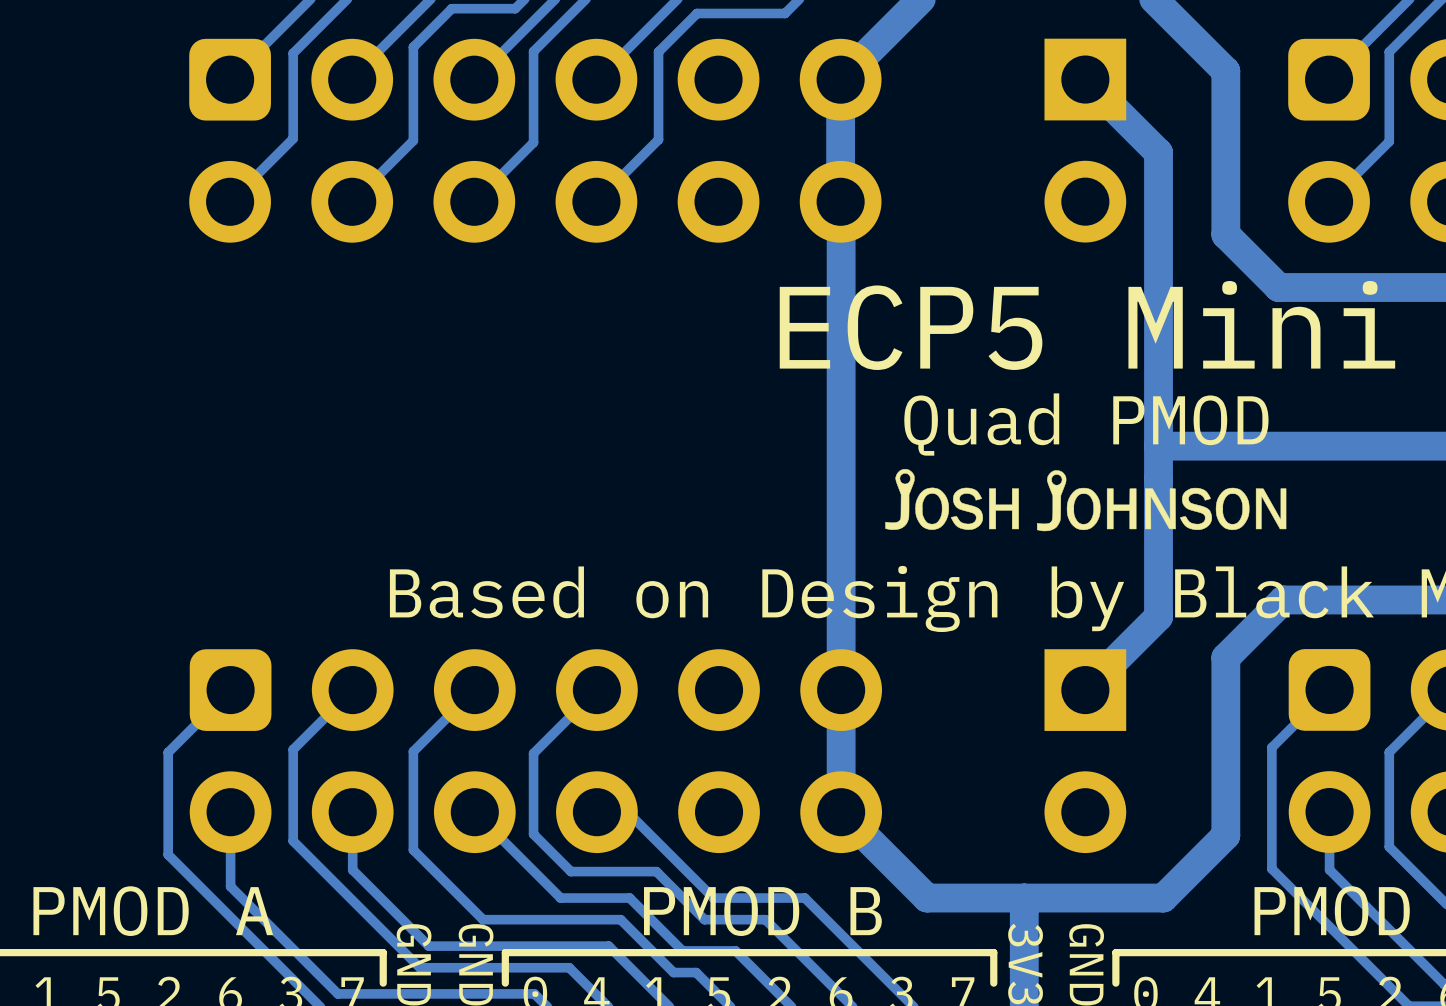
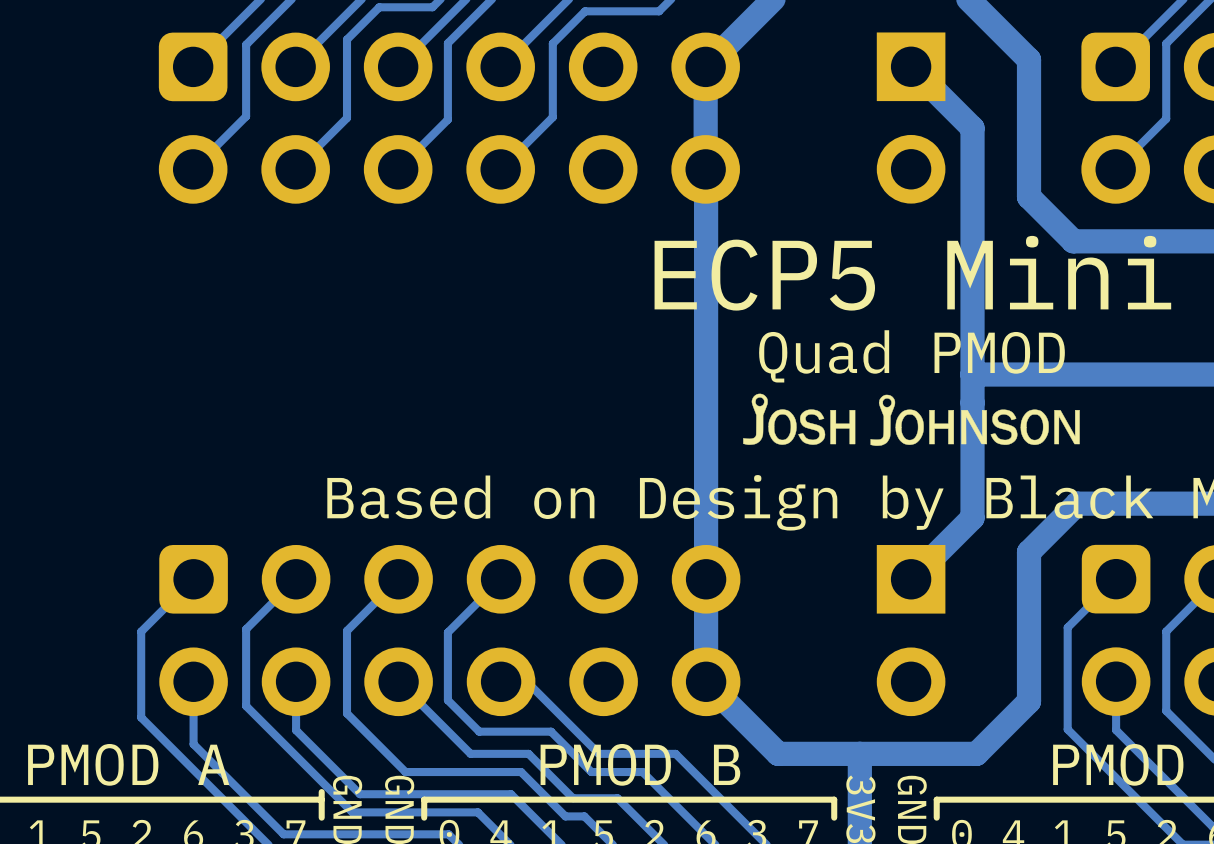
line: (383, 974) (383, 983) -> (321, 792) (321, 799)
line: (505, 974) (505, 983) -> none
line: (993, 974) (993, 983) -> none
line: (1115, 974) (1115, 983) -> none

